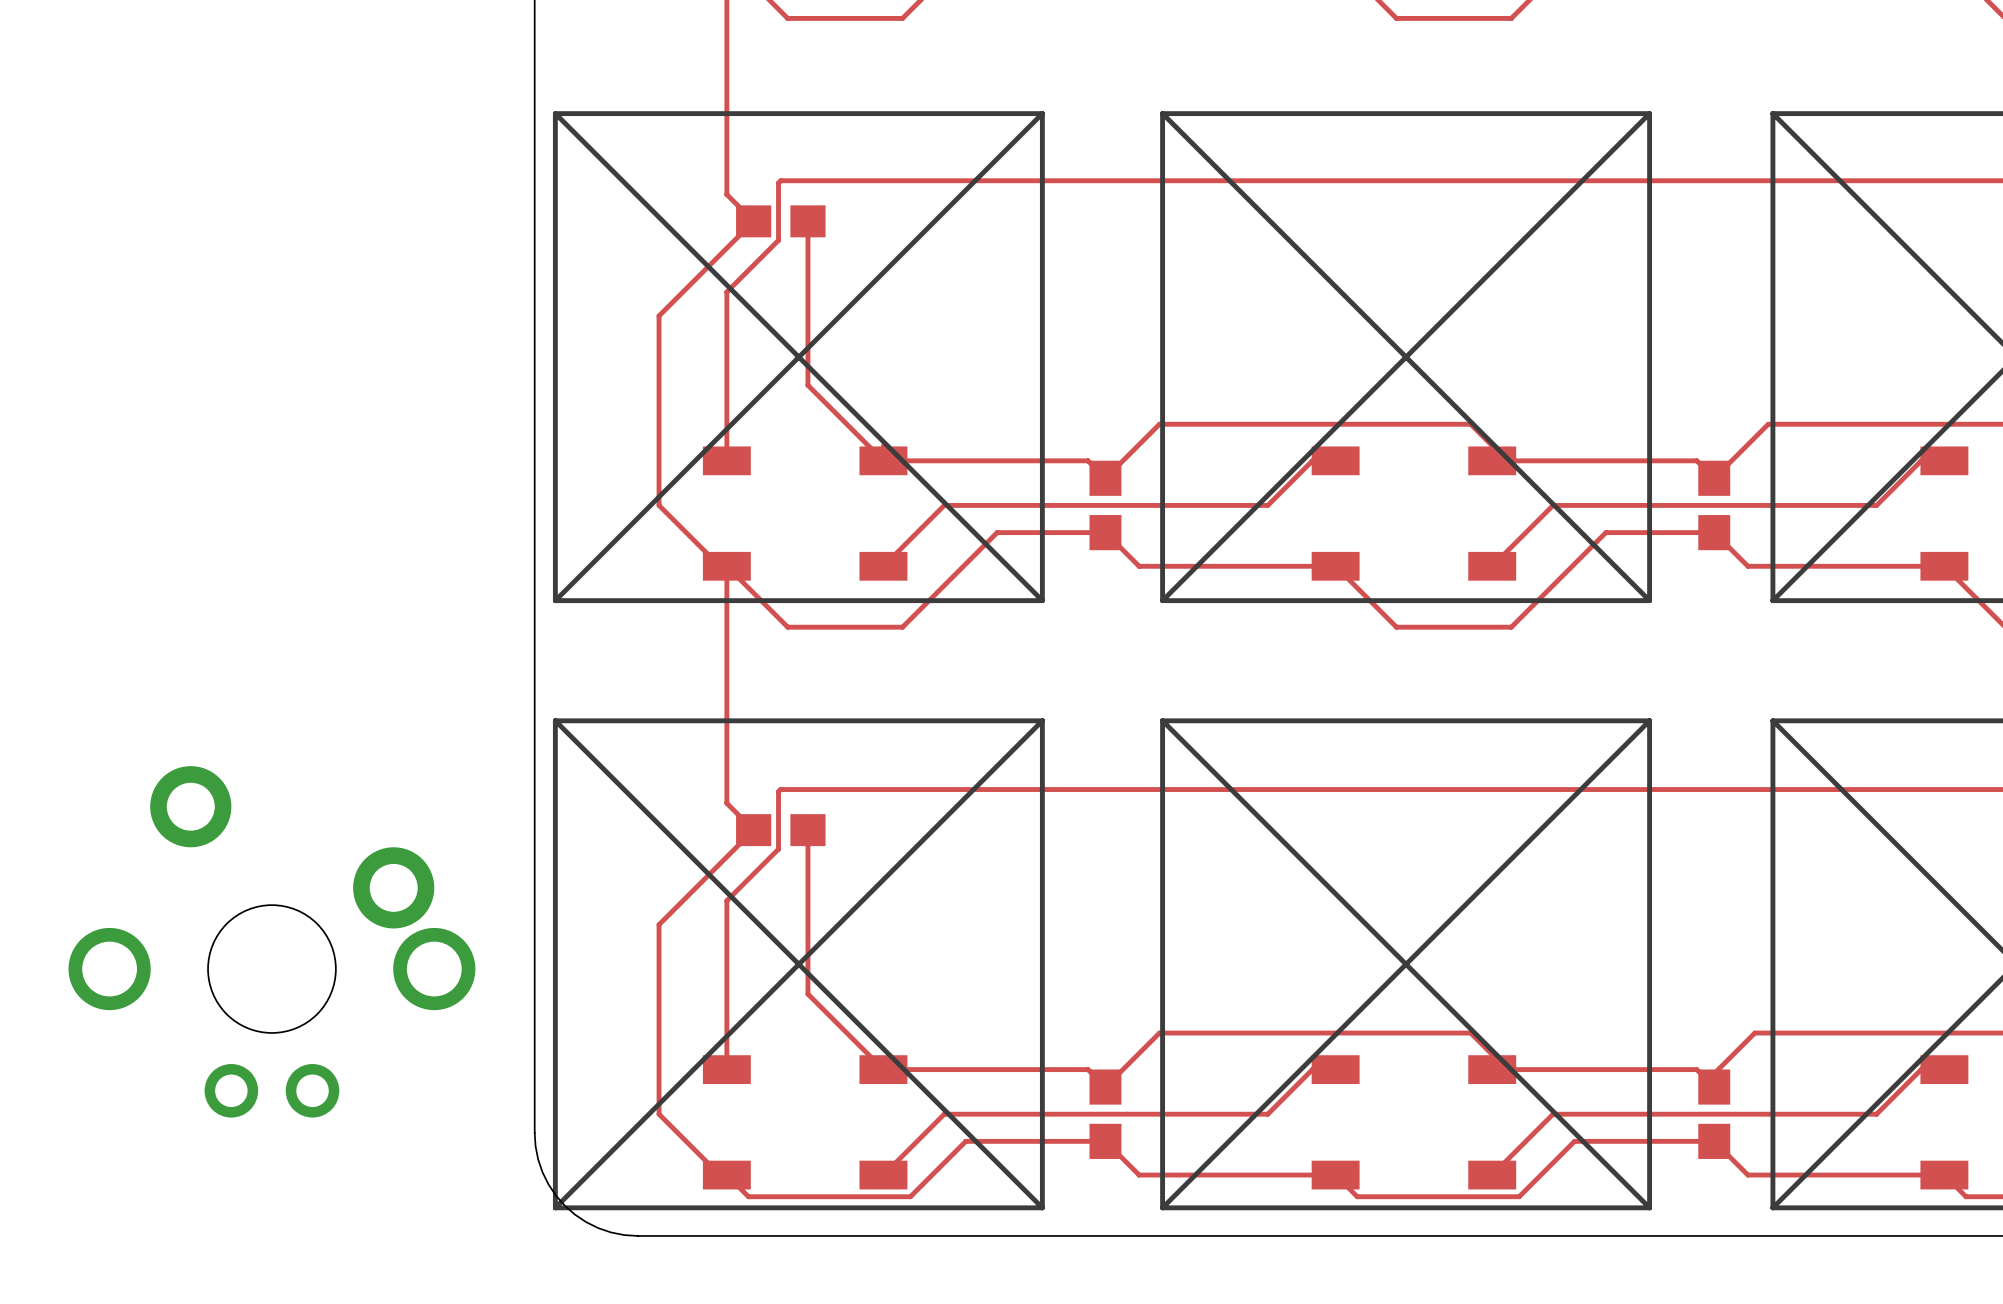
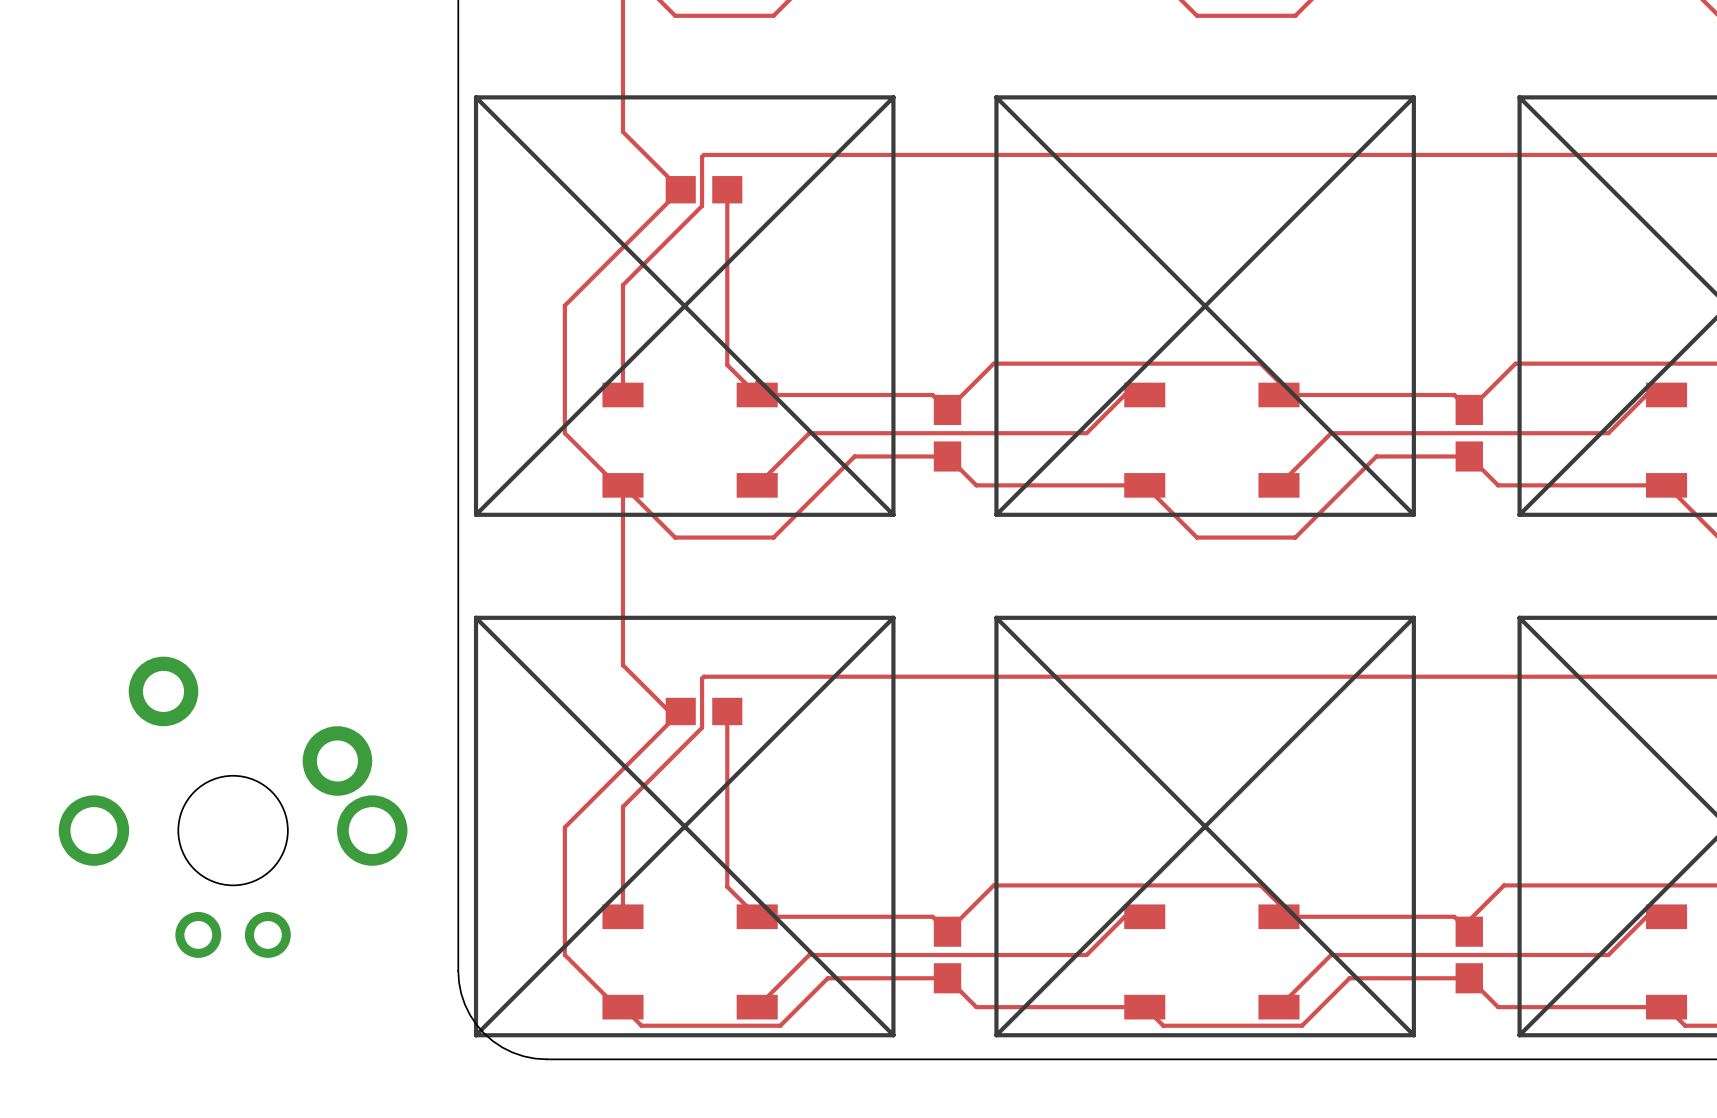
top track: (726, 153) (726, 194) (753, 221) (659, 315) (659, 356) -> (622, 131) (680, 189) (564, 305)
top track: (821, 180) (780, 180) (778, 183) (778, 240) (726, 292) (726, 332) -> (704, 154) (702, 156) (702, 206) (622, 285)
part position: (780, 221) -> (704, 189)
top track: (807, 221) (807, 385) (848, 425) -> (727, 189) (727, 365)
top track: (726, 776) (726, 803) (753, 830) (659, 924) (659, 965) -> (680, 711) (564, 827)
top track: none -> (622, 665) (674, 717)
top track: (821, 789) (780, 789) (778, 791) (778, 849) (726, 900) (726, 941) -> (704, 676) (702, 678) (702, 727) (622, 806)
part position: (780, 830) -> (704, 711)
top track: (807, 830) (807, 994) (848, 1034) -> (727, 711) (727, 886)

